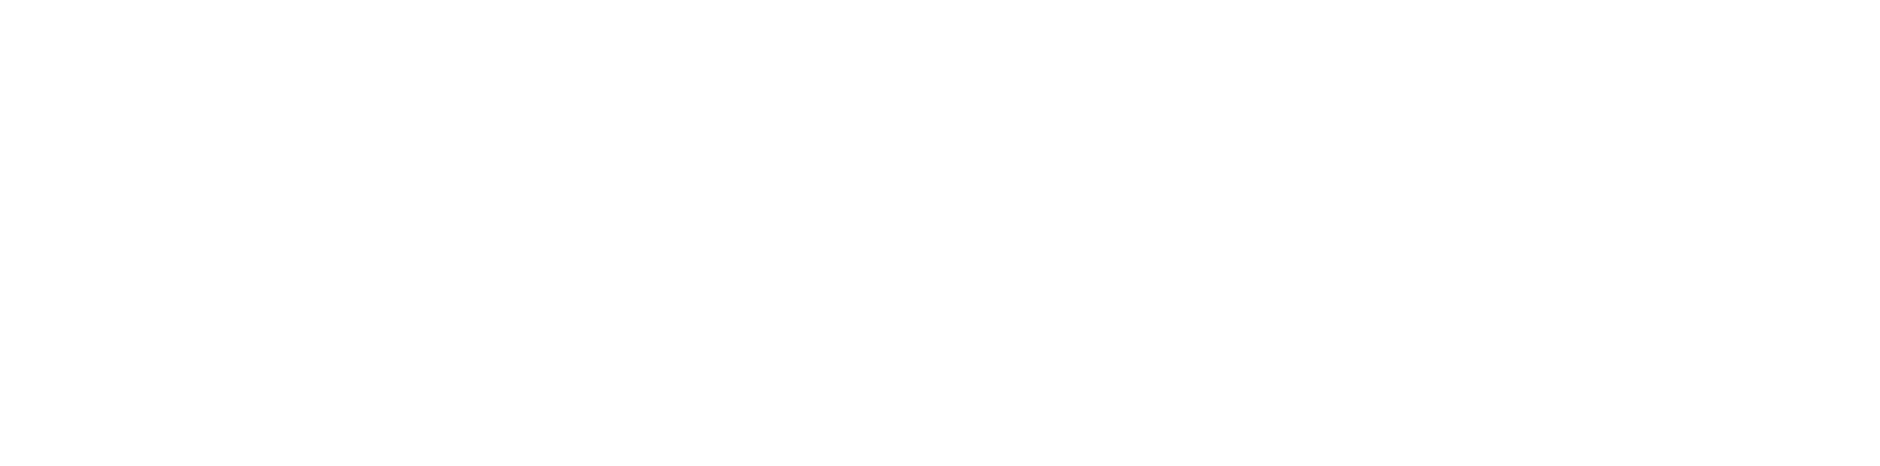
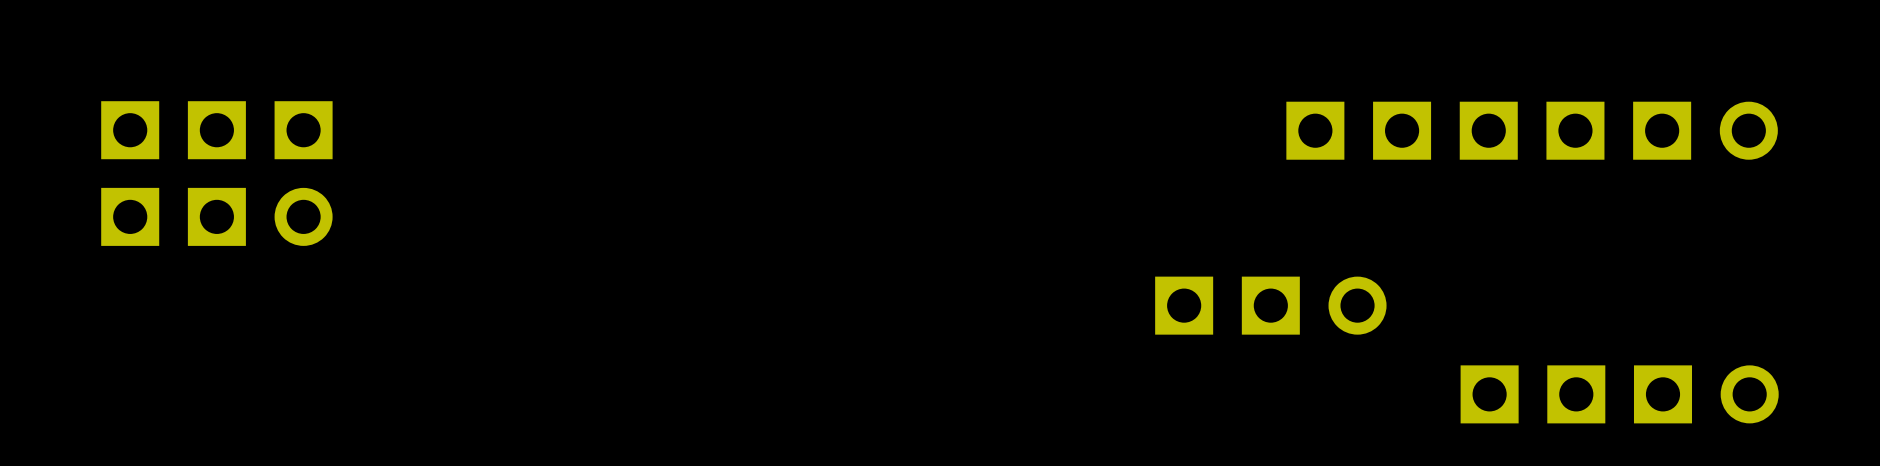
part: none -> (1532, 130)
part: none -> (216, 173)
part: none -> (1270, 305)
part: none -> (1619, 394)

